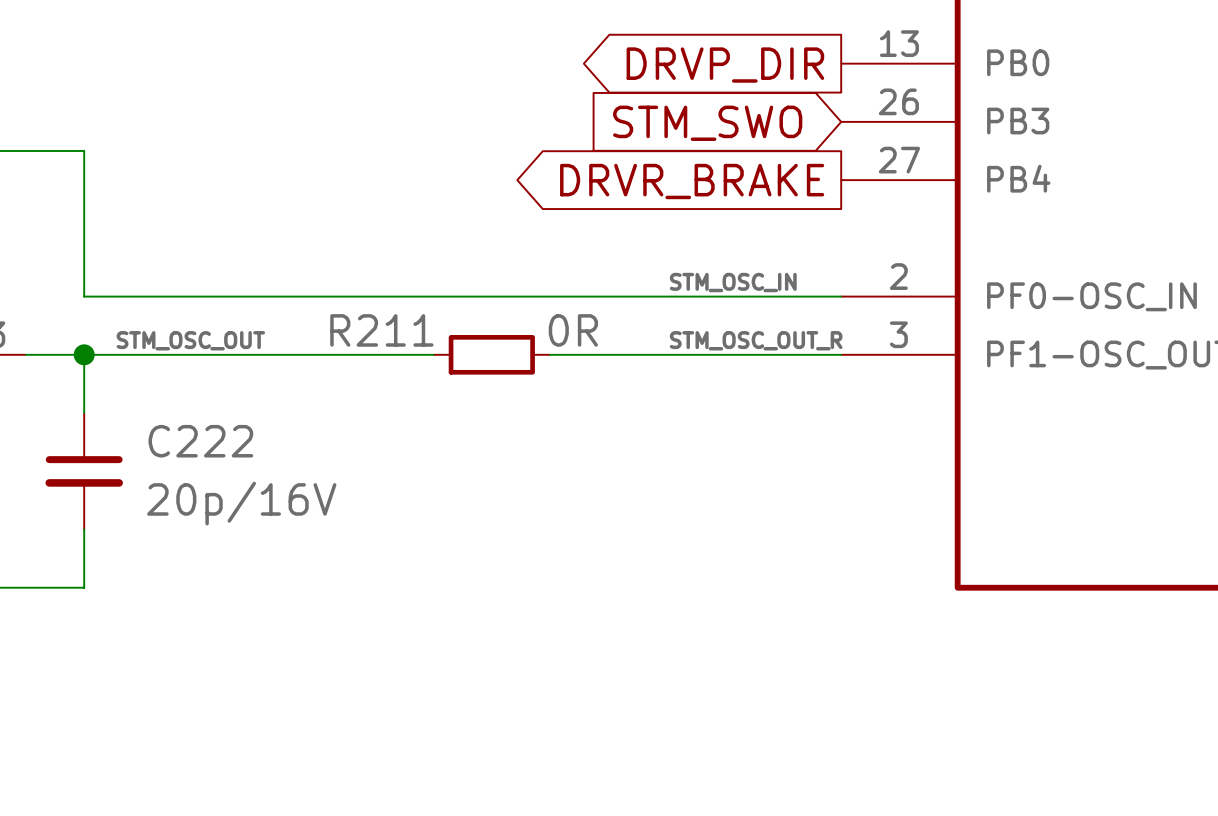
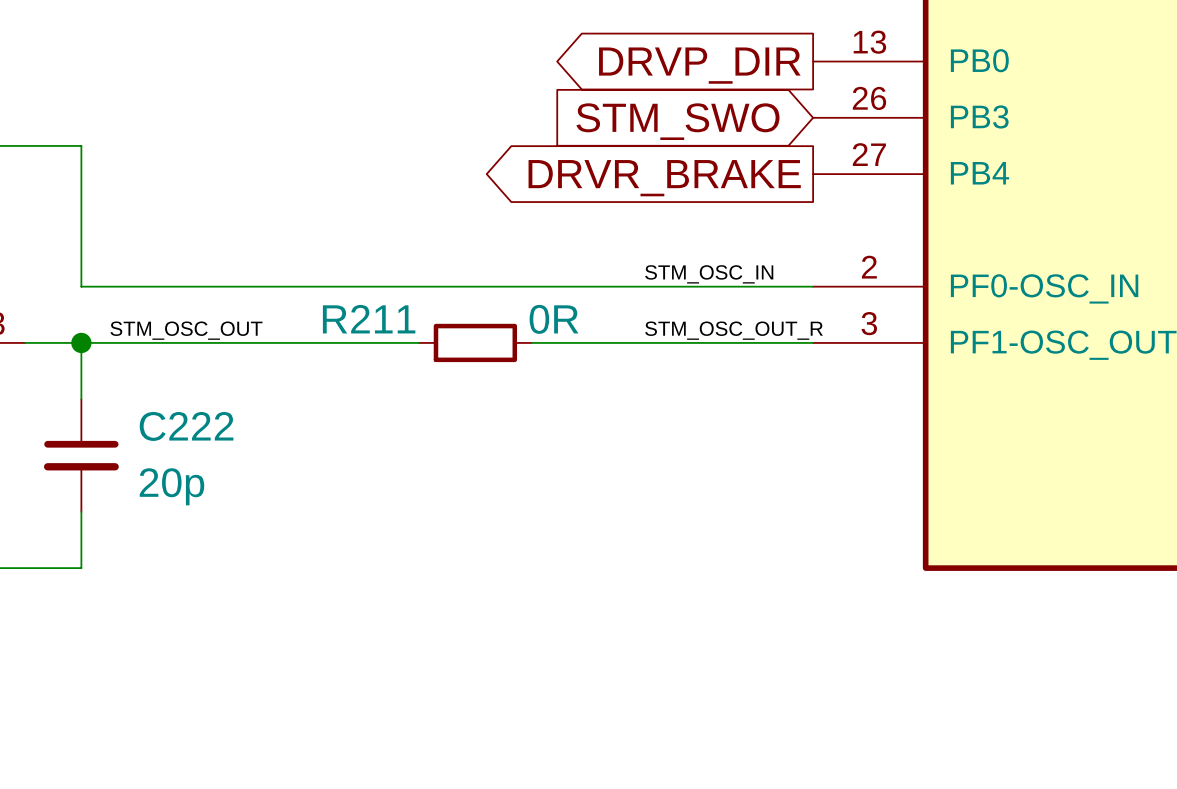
C222 value: 20p/16V (241, 503) -> 20p (171, 486)

